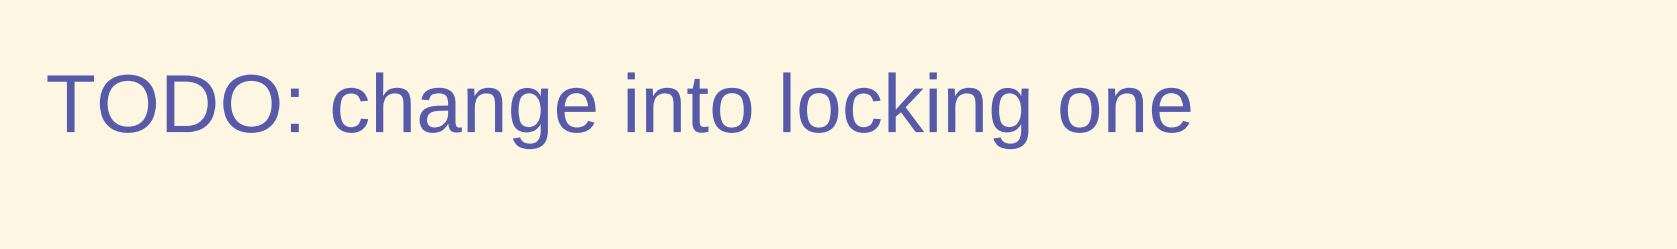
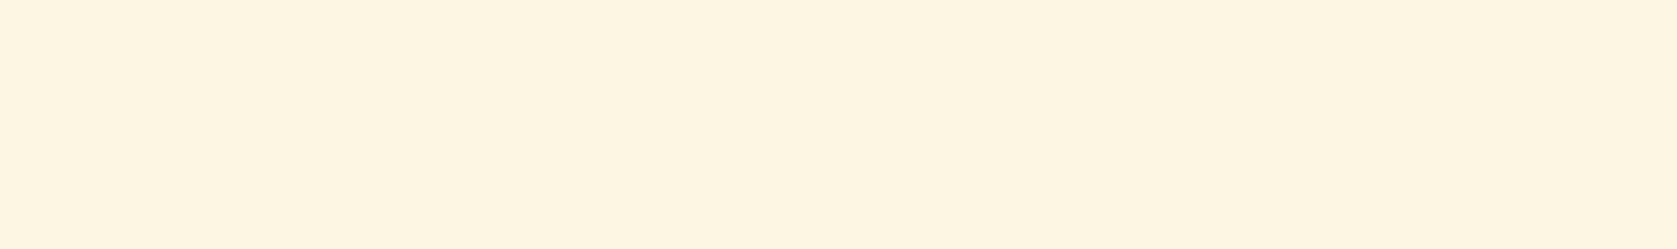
text: TODO: change into locking one (618, 110) -> none

